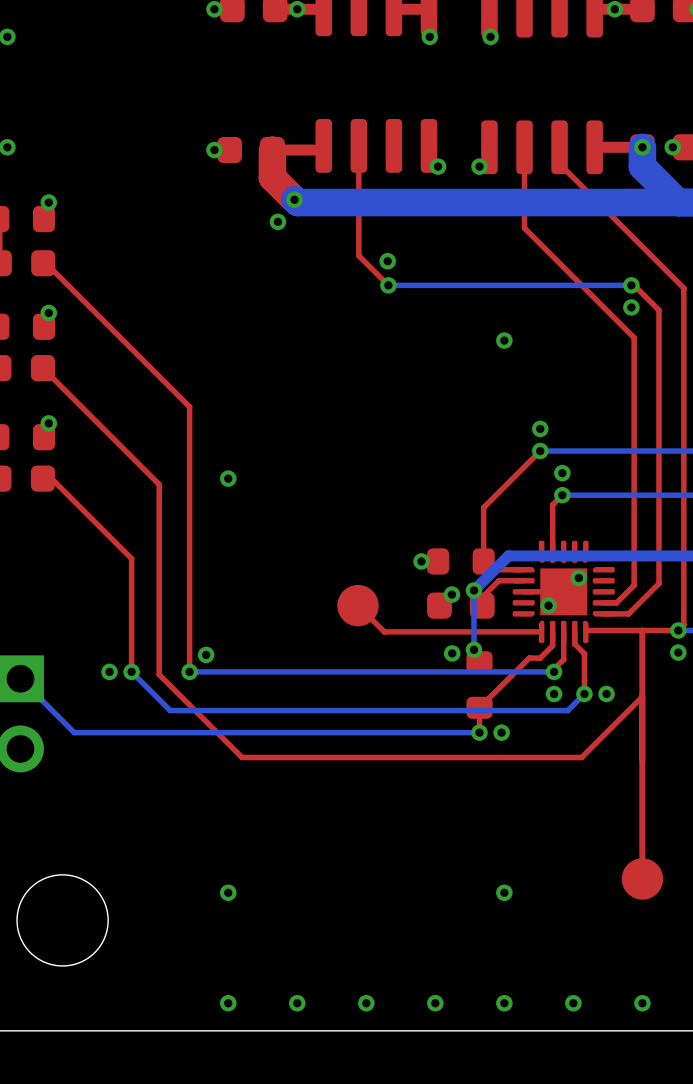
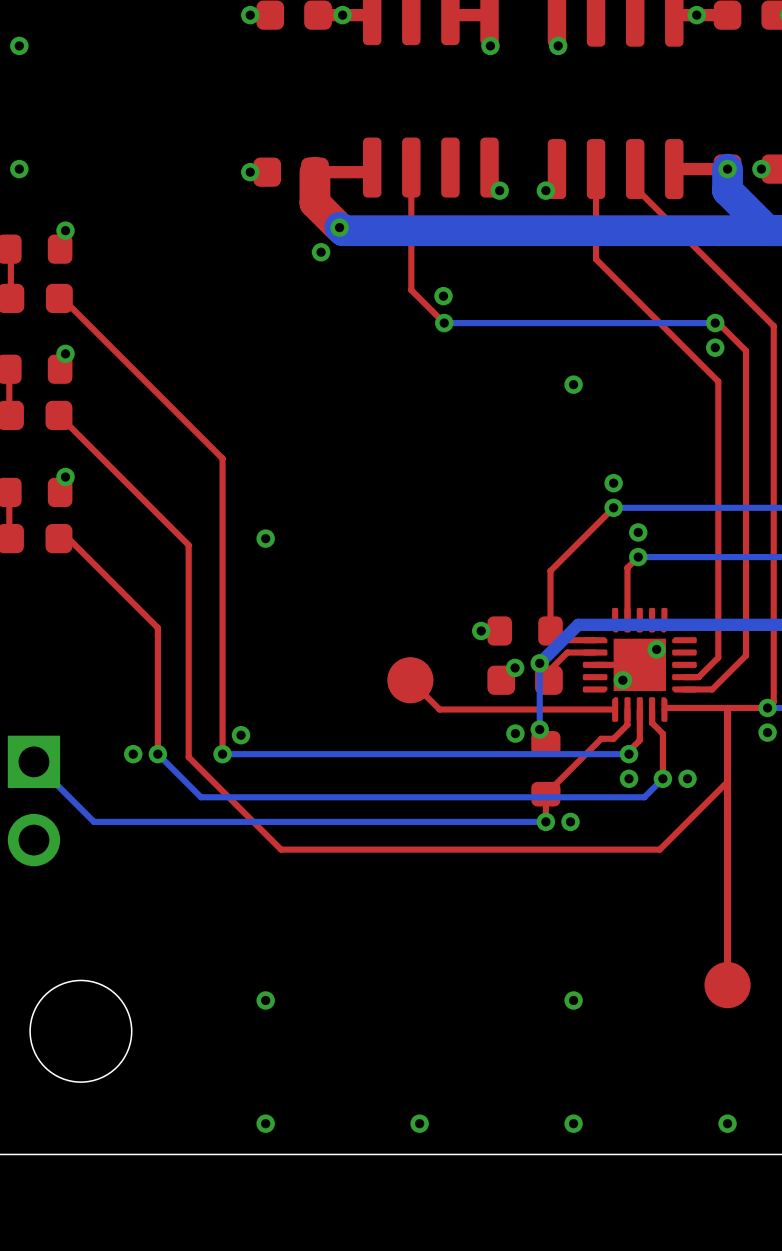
via: (297, 1003) -> none
via: (435, 1003) -> none
via: (573, 1003) -> none

